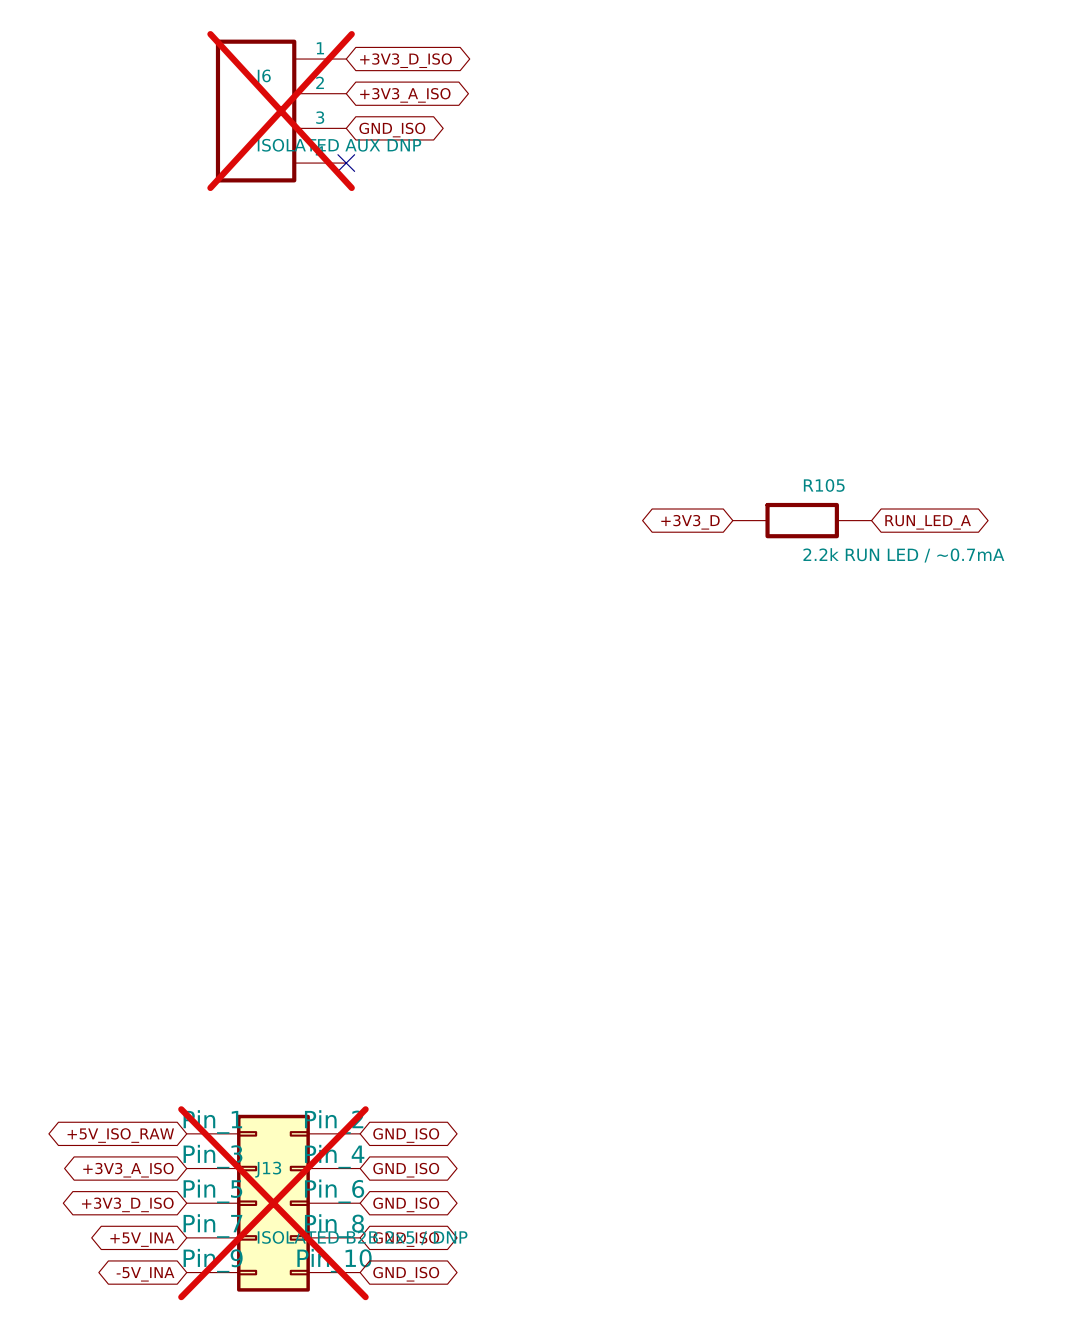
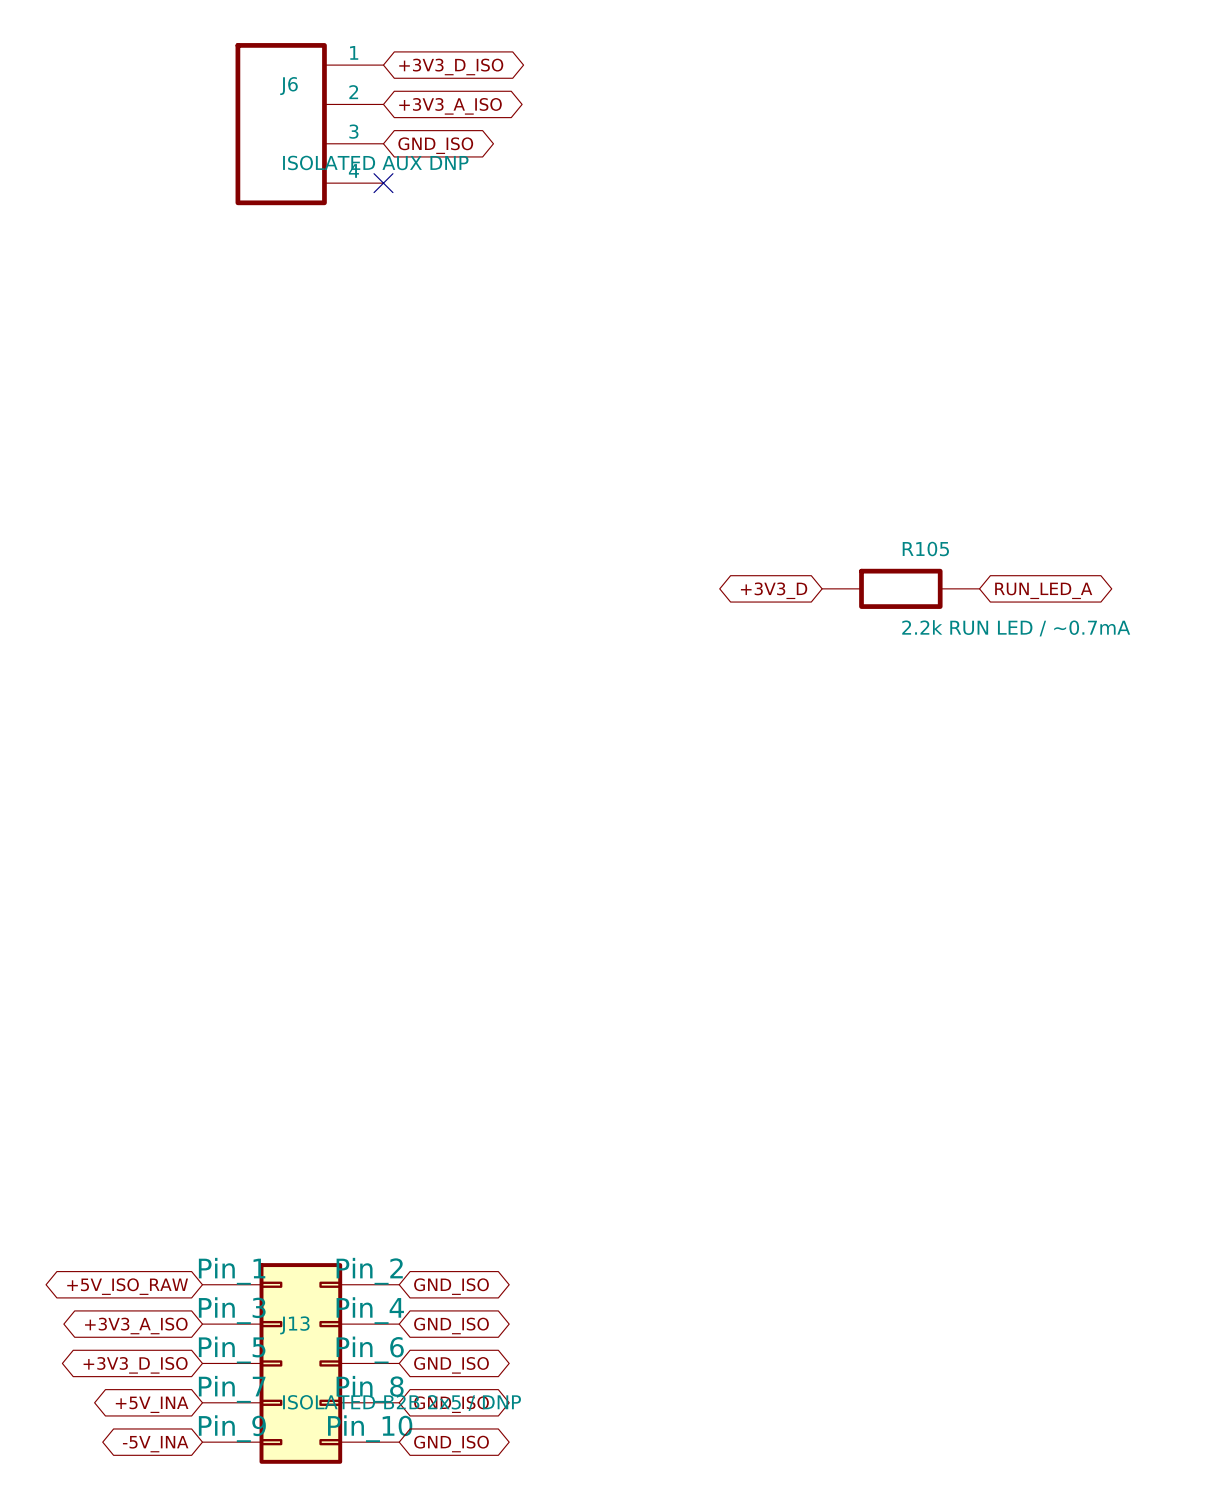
J6 do-not-place cross: (281, 111) -> none
J13 do-not-place cross: (273, 1203) -> none

